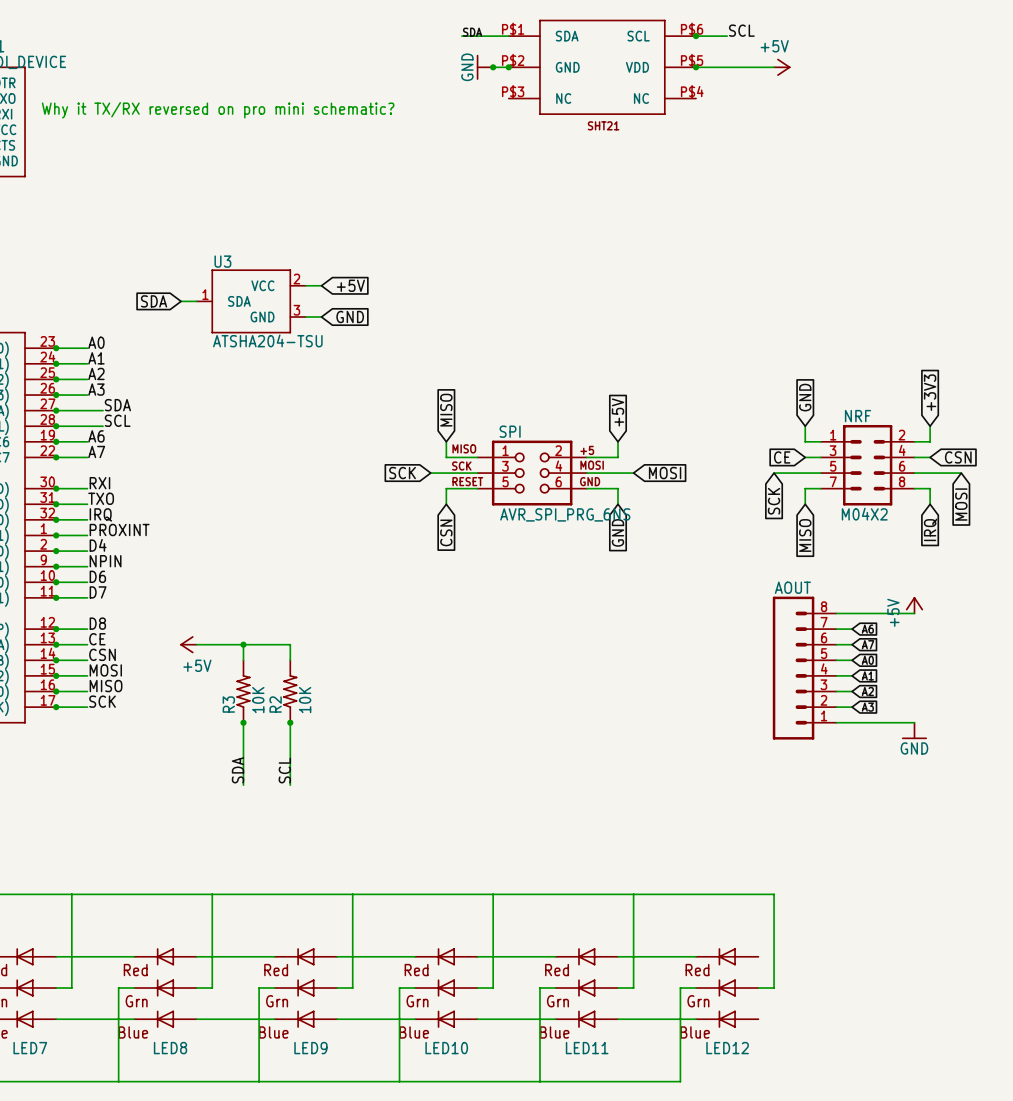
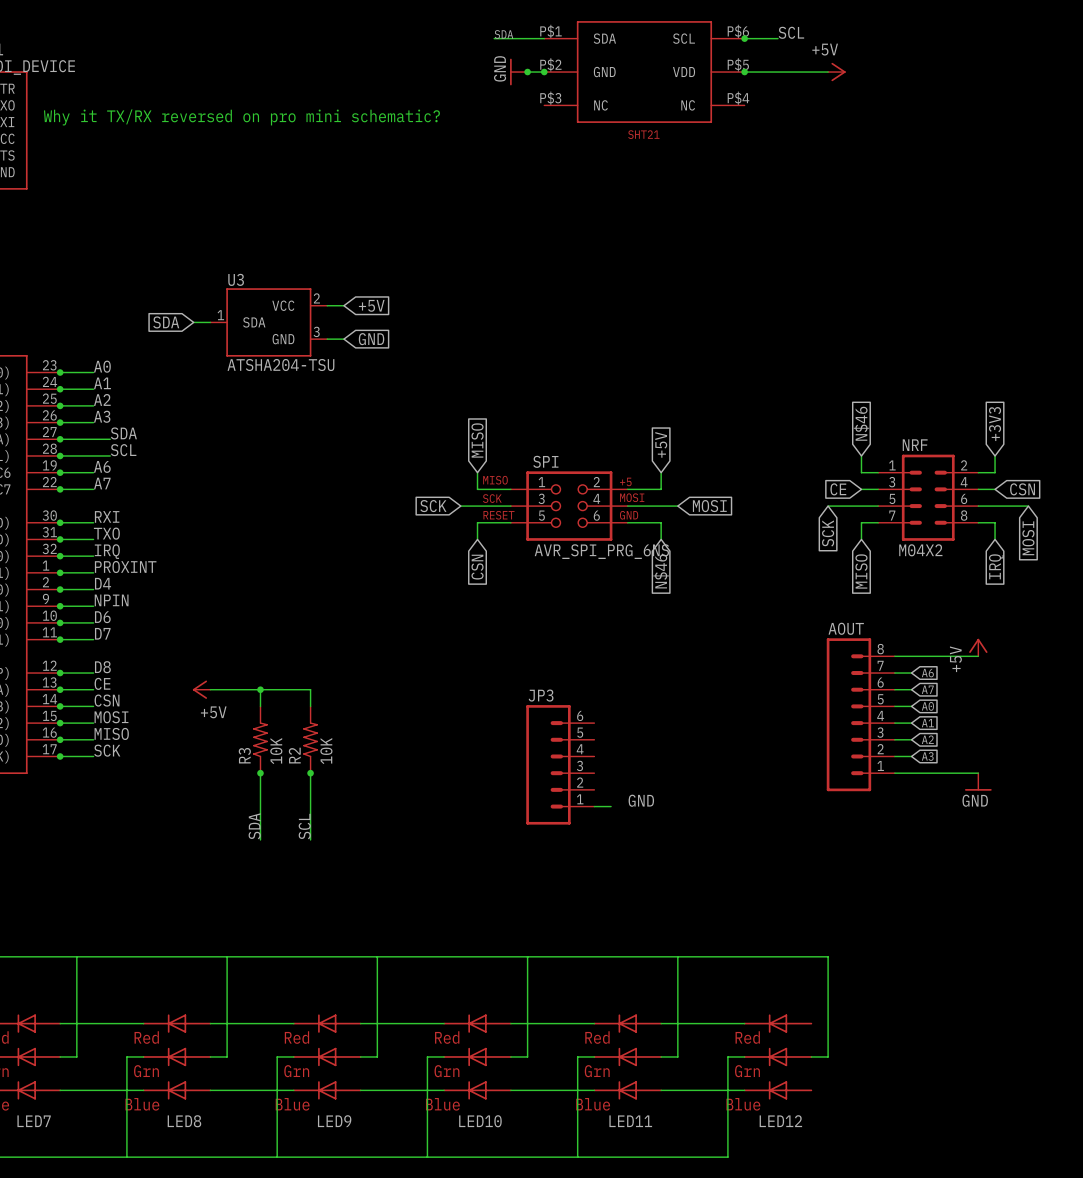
global label: GND (805, 397) -> N$46 (861, 423)
global label: GND (618, 532) -> N$46 (661, 571)
JP3: none -> (560, 764)
label: none -> GND (641, 800)
wire: none -> (594, 806) (611, 806)

